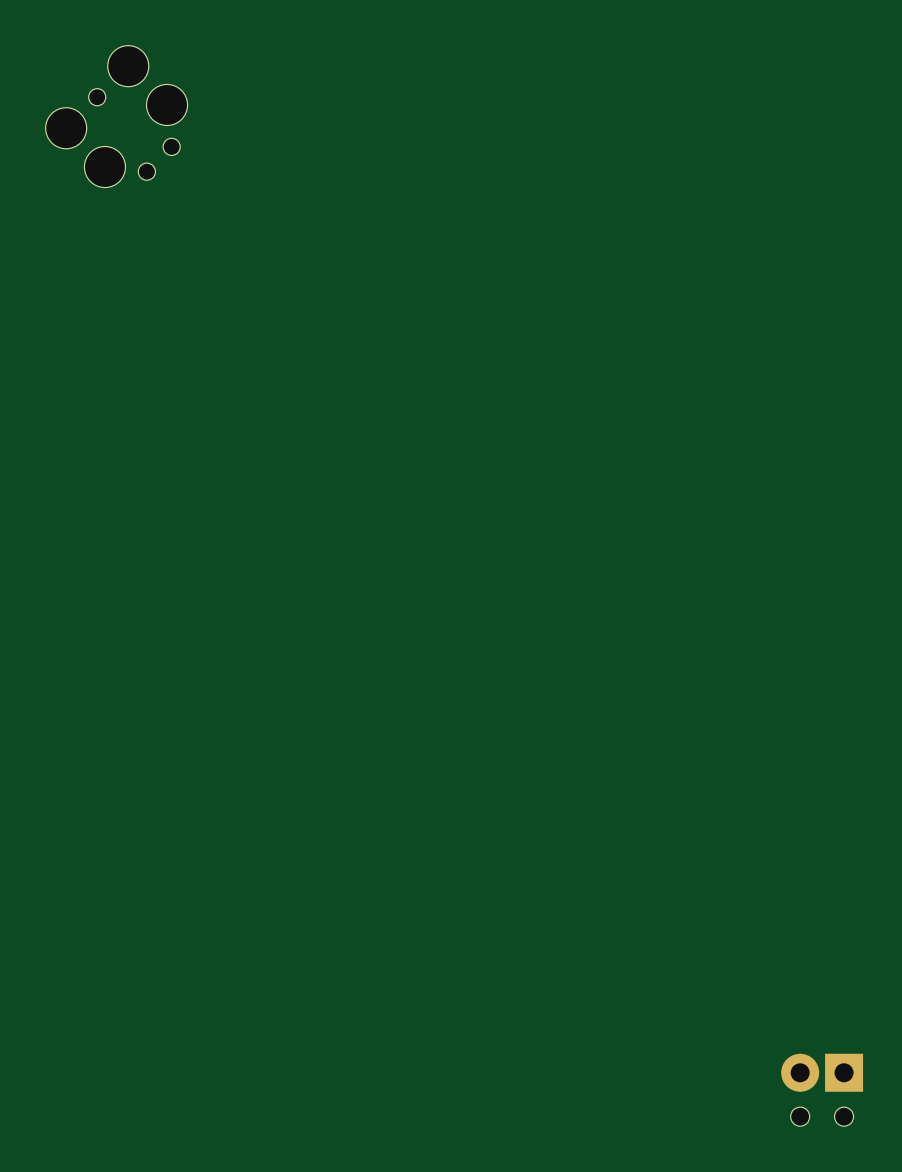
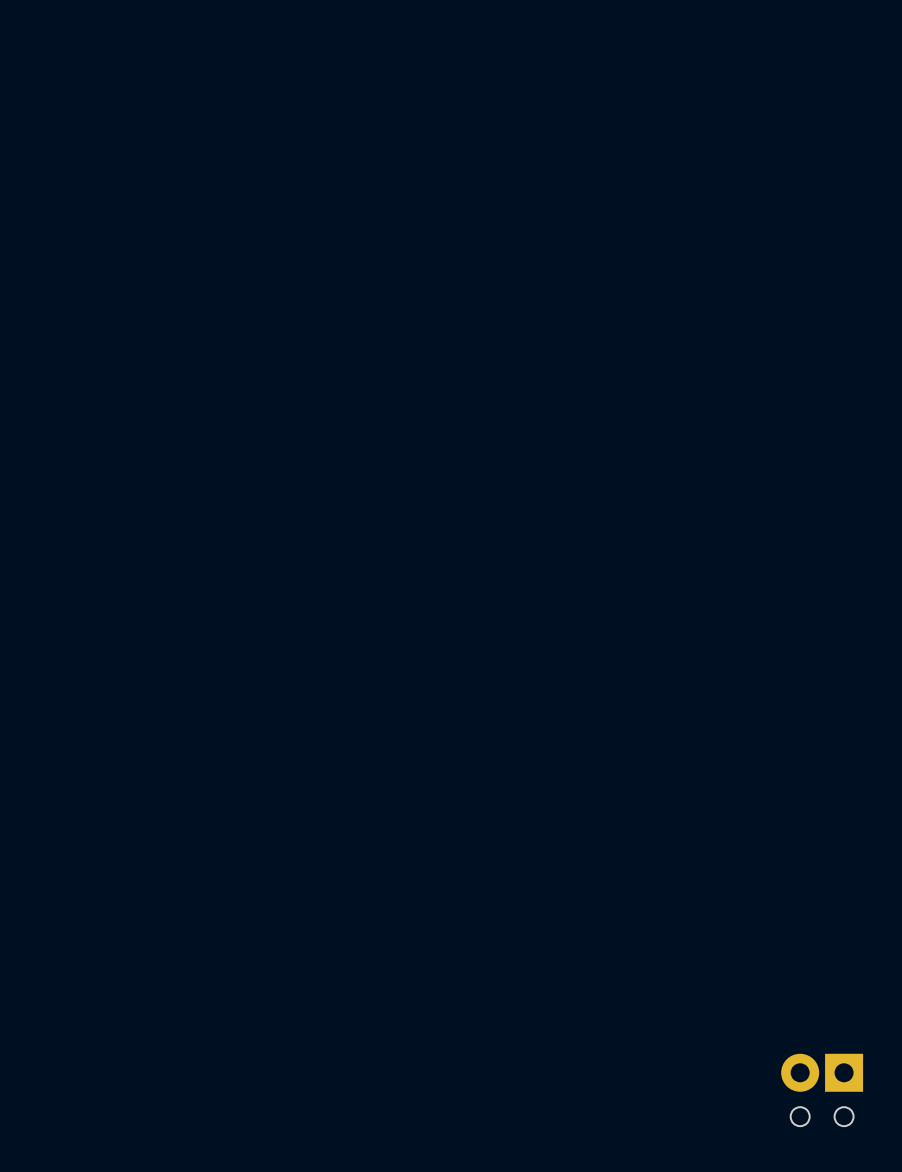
part: (116, 116) -> none

